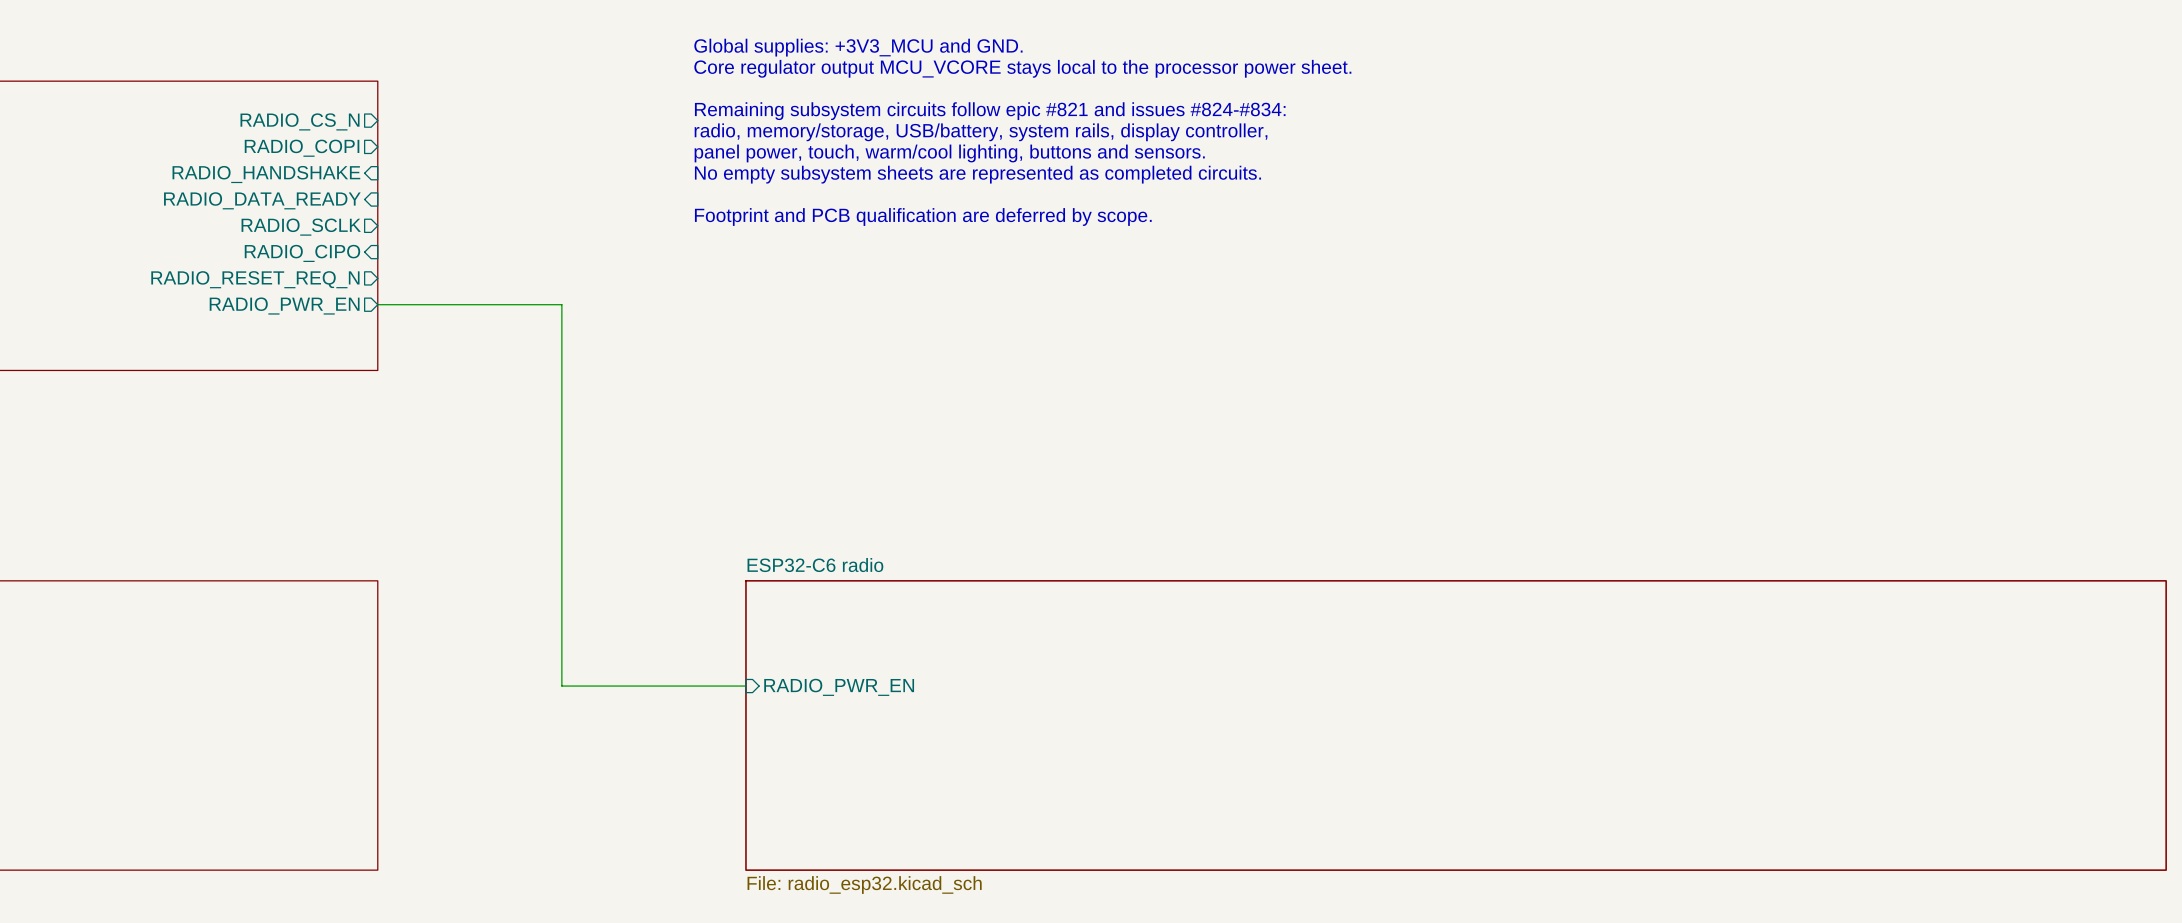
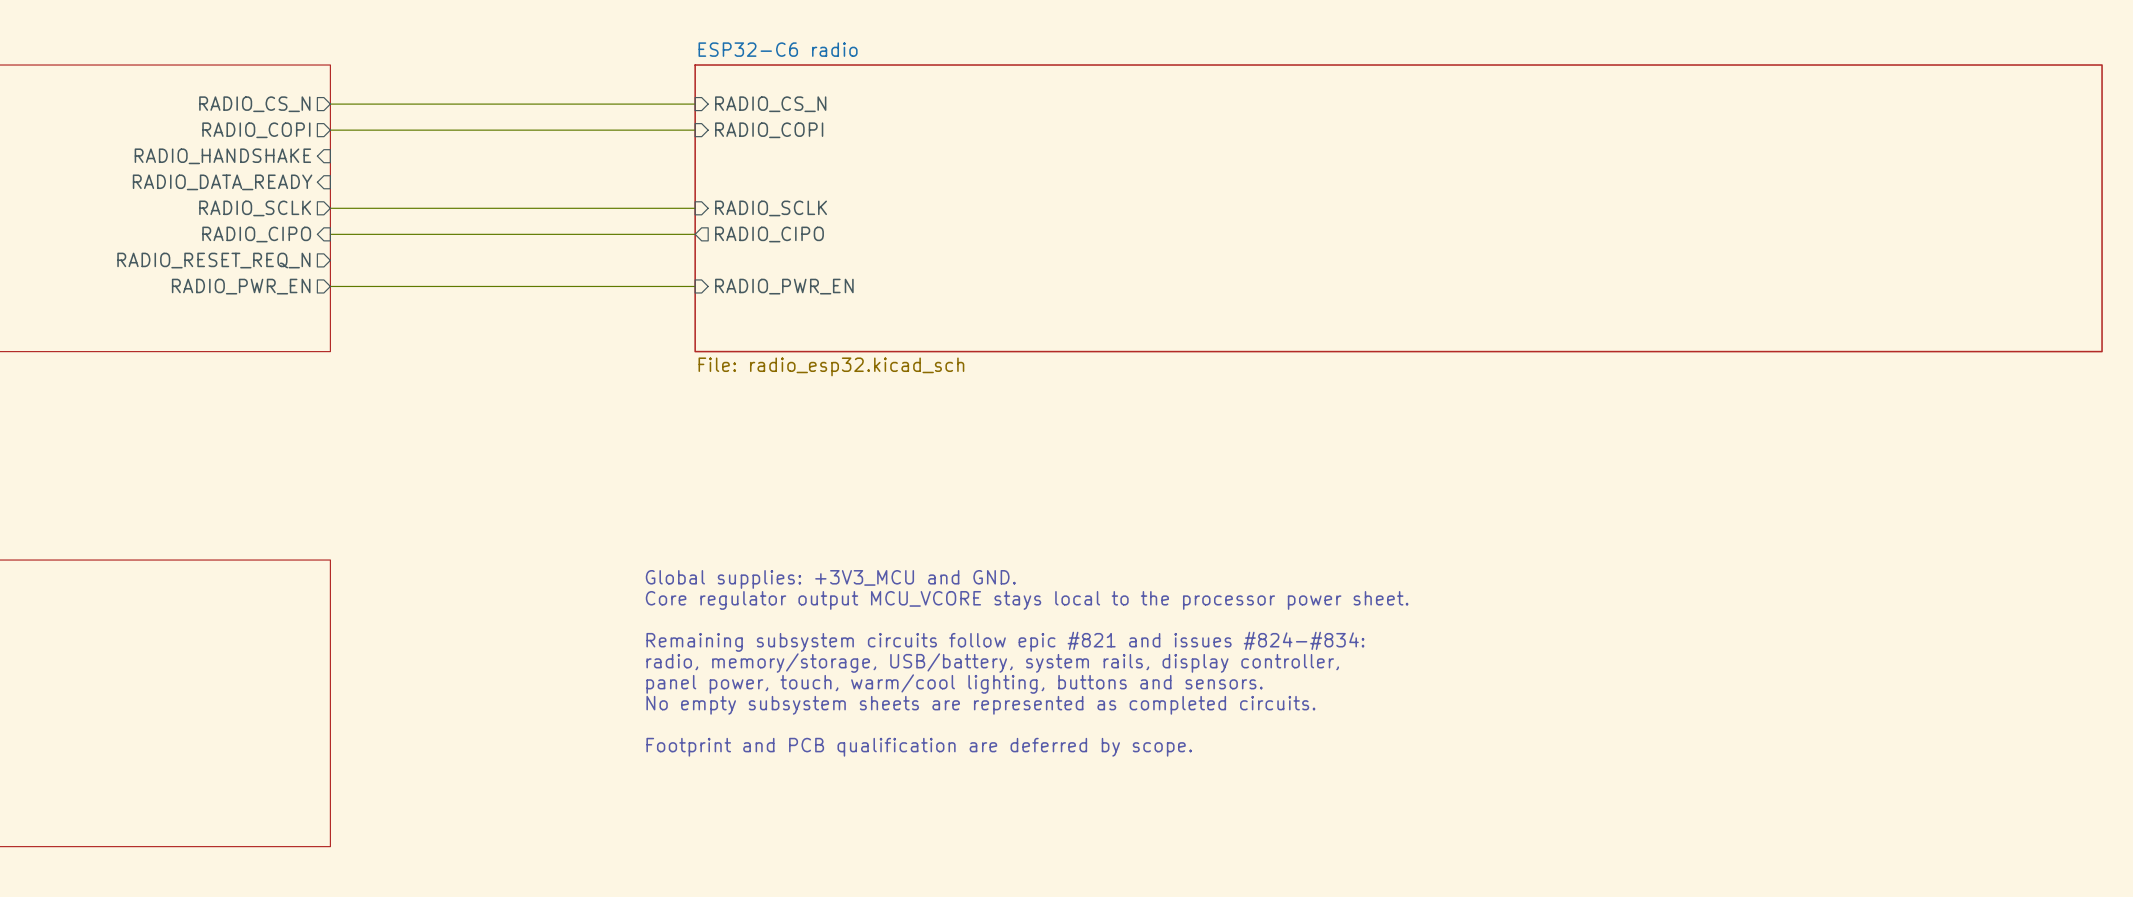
text: Global supplies: +3V3_MCU and GND. (858, 47) -> none
text: Core regulator output MCU_VCORE stays local to the processor power sheet. (1022, 68) -> none
text: Remaining subsystem circuits follow epic #821 and issues #824-#834: (990, 111) -> none
wire: none -> (330, 104) (695, 104)
sheet pin: none -> RADIO_CS_N (770, 104)
text: radio, memory/storage, USB/battery, system rails, display controller, (981, 132) -> none
wire: none -> (330, 130) (695, 130)
sheet pin: none -> RADIO_COPI (769, 130)
text: panel power, touch, warm/cool lighting, buttons and sensors. (949, 153) -> none
text: No empty subsystem sheets are represented as completed circuits. (977, 174) -> none
text: Footprint and PCB qualification are deferred by scope. (923, 216) -> none
wire: none -> (330, 208) (695, 208)
sheet pin: none -> RADIO_SCLK (771, 208)
wire: none -> (330, 234) (695, 234)
sheet pin: none -> RADIO_CIPO (769, 234)
wire: (561, 304) (561, 686) (745, 686) -> (512, 286) (695, 286)
sheet pin: none -> RADIO_PWR_EN (784, 286)
text: none -> Global supplies: +3V3_MCU and GND. (830, 579)
text: none -> Core regulator output MCU_VCORE stays local to the processor power sheet. (1027, 600)
text: none -> Remaining subsystem circuits follow epic #821 and issues #824-#834: (1005, 641)
text: none -> radio, memory/storage, USB/battery, system rails, display controller, (992, 663)
sheet pin: RADIO_PWR_EN (839, 687) -> none
text: none -> panel power, touch, warm/cool lighting, buttons and sensors. (954, 684)
sheet ESP32-C6 radio position: (1456, 725) -> (1398, 208)
text: none -> No empty subsystem sheets are represented as completed circuits. (980, 705)
text: none -> Footprint and PCB qualification are deferred by scope. (919, 747)

